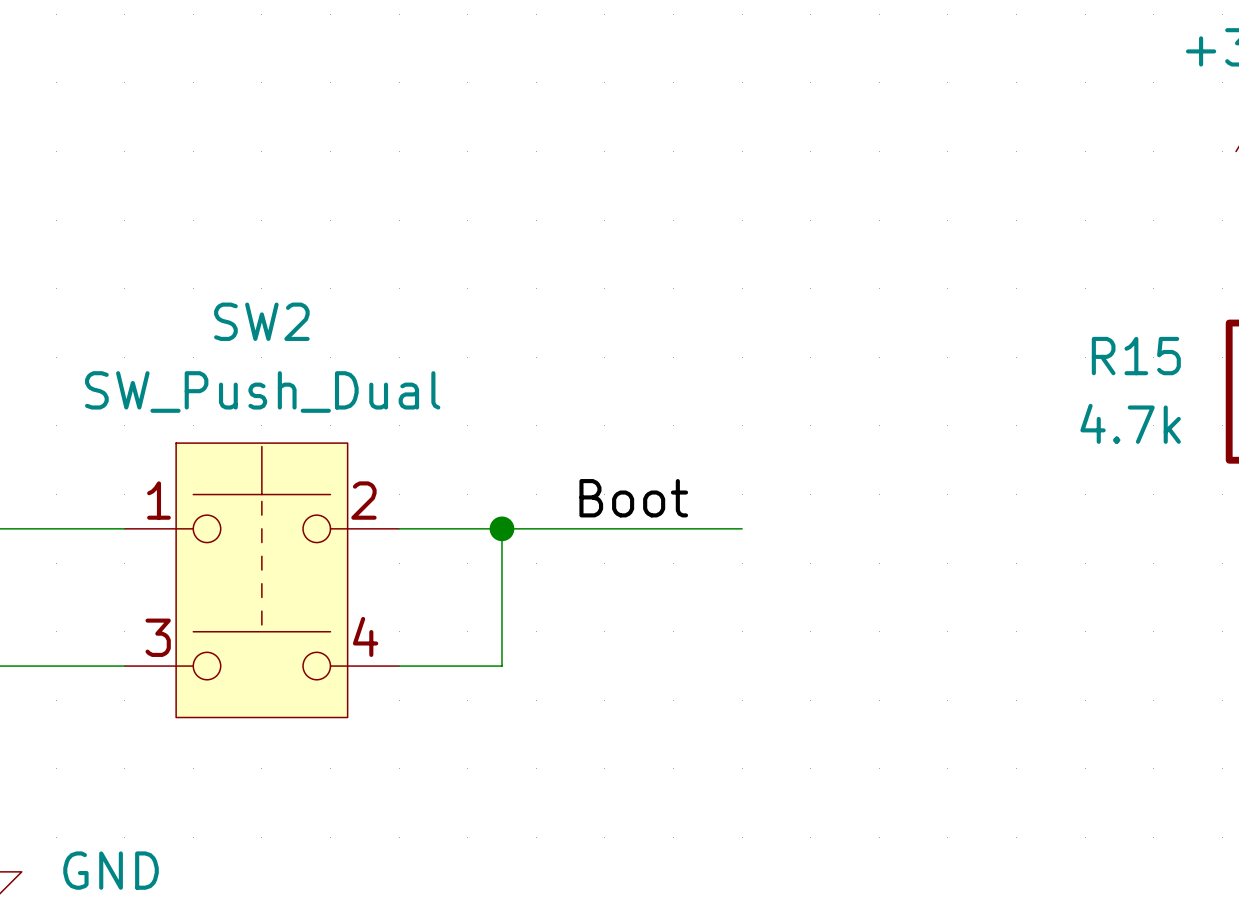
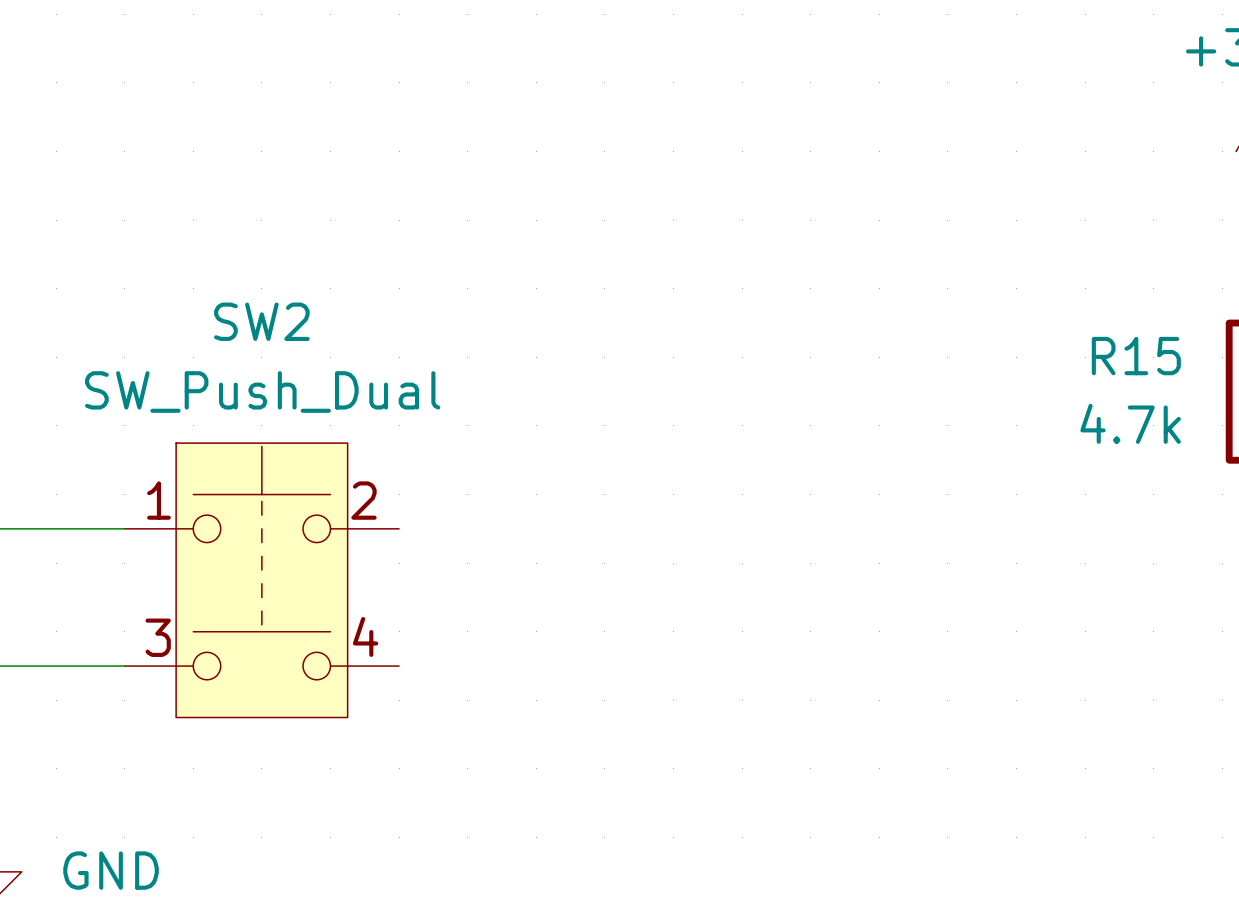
label: Boot (633, 498) -> none
wire: (399, 528) (742, 528) -> none
wire: (501, 528) (501, 666) (399, 666) -> none
junction: (501, 528) -> none

